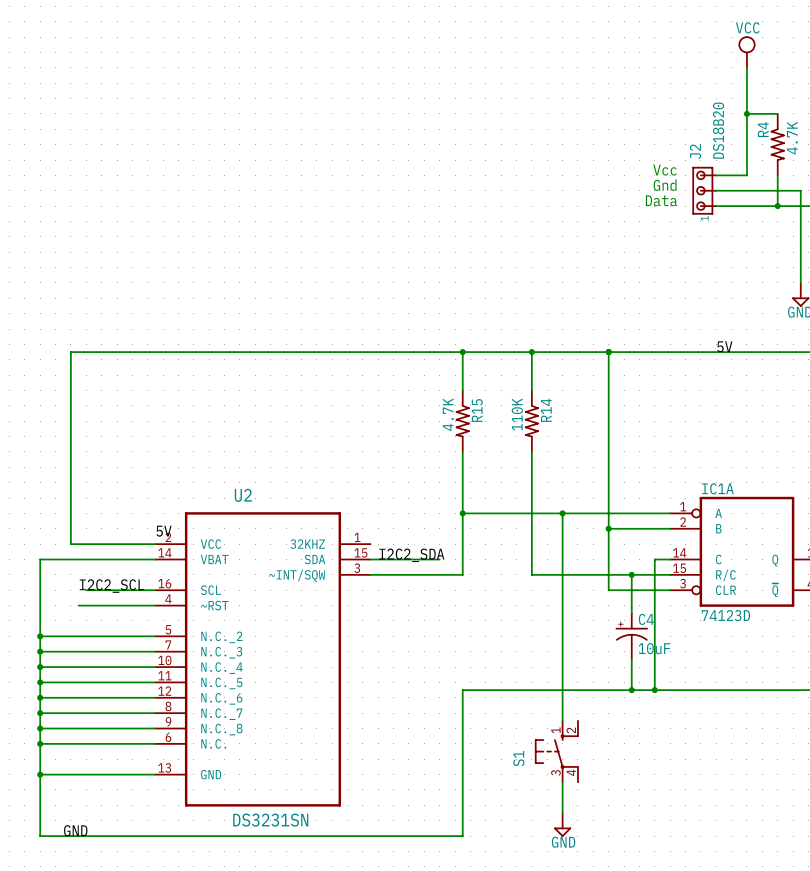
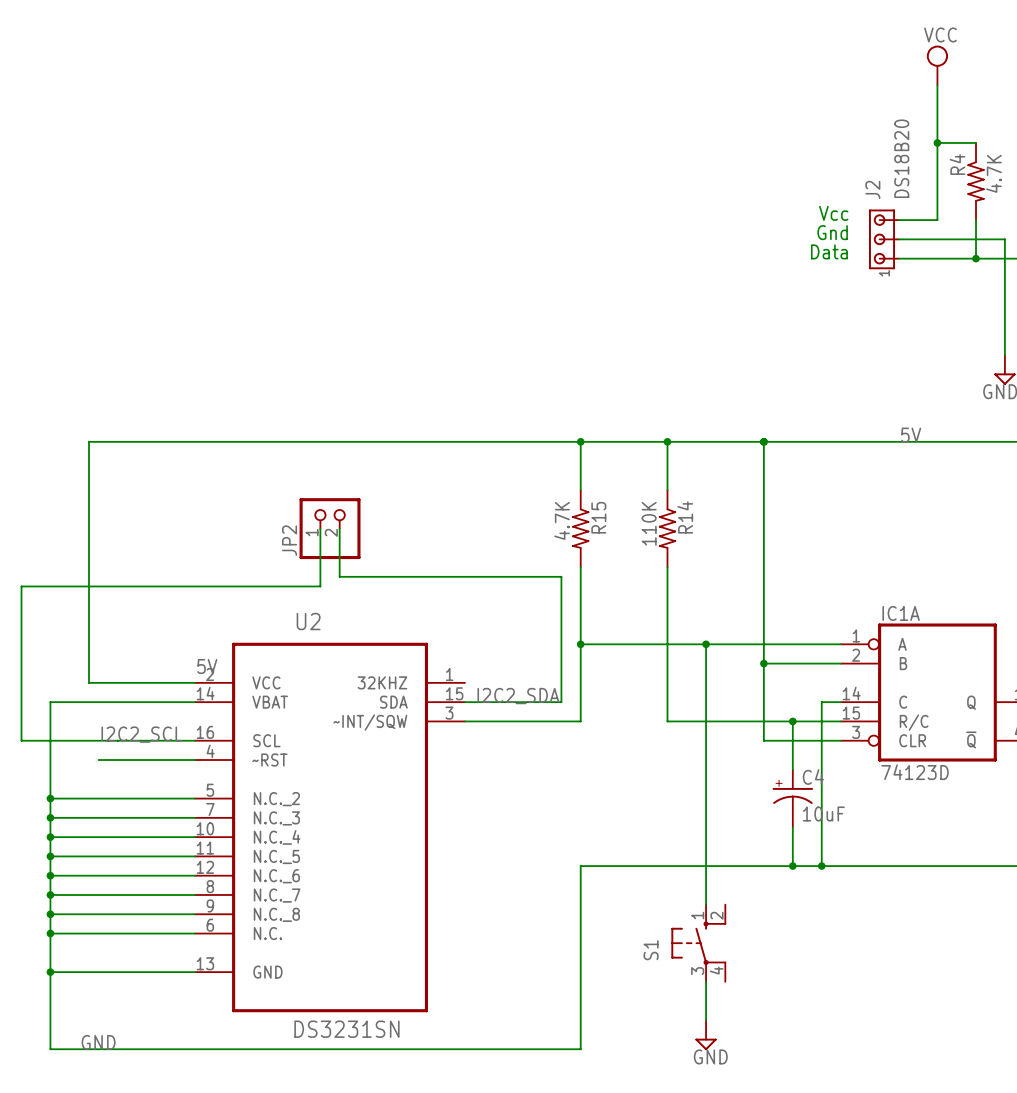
wire: none -> (320, 528) (320, 586) (21, 586) (21, 740) (108, 740)
JP2: none -> (330, 528)
wire: none -> (339, 528) (339, 576) (561, 576) (561, 702) (551, 702)

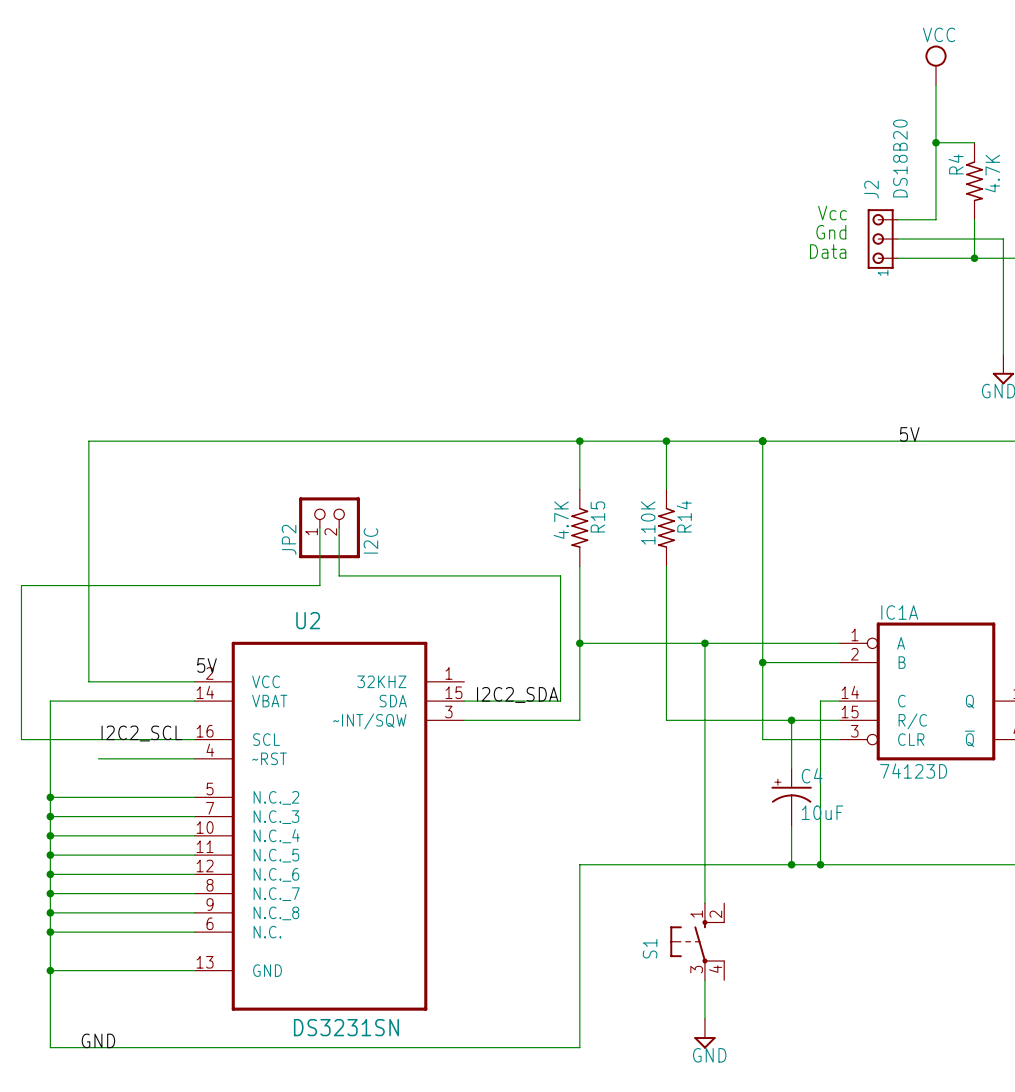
JP2 value: none -> I2C (370, 540)

